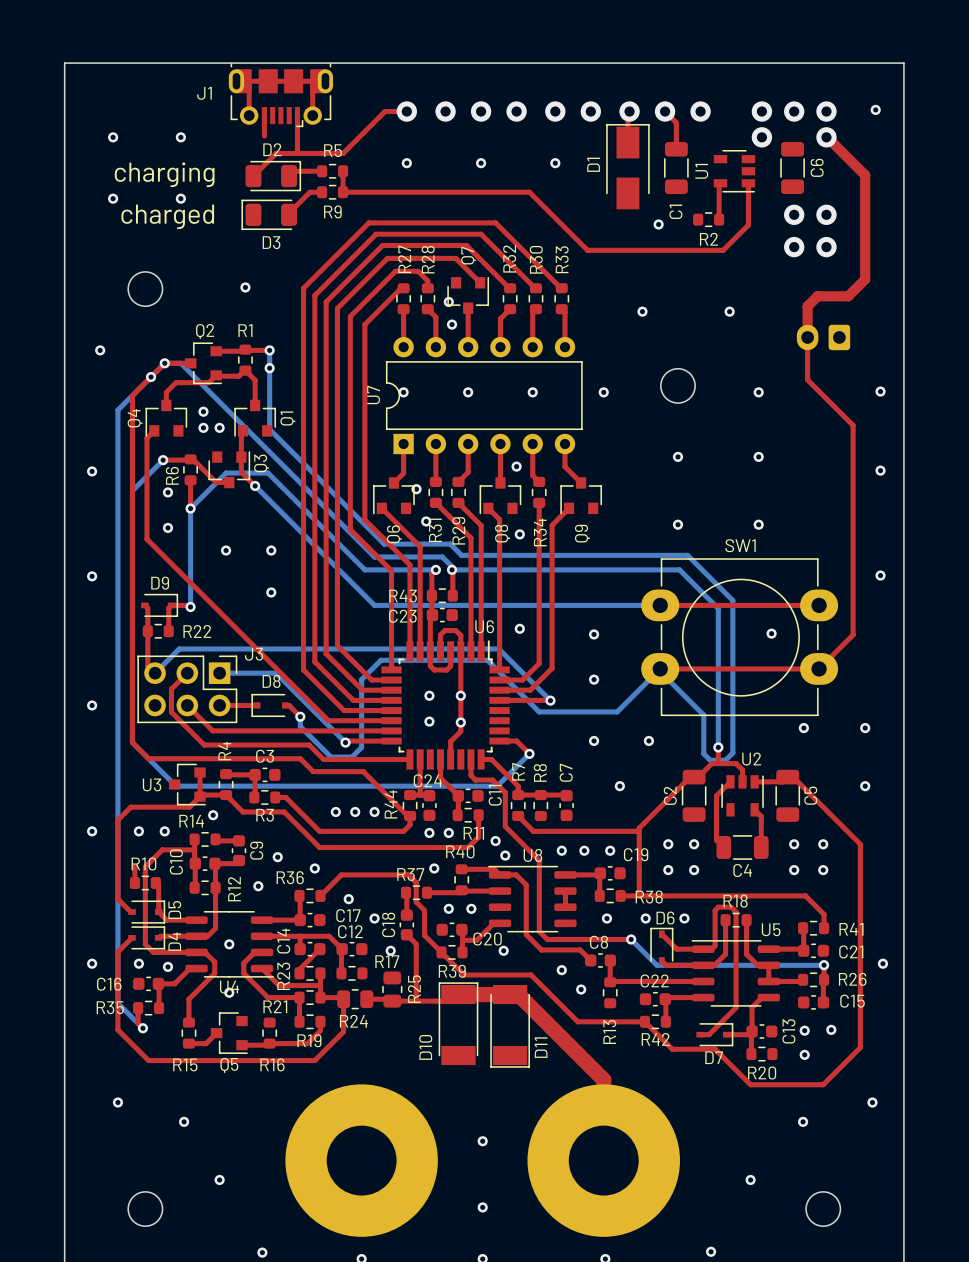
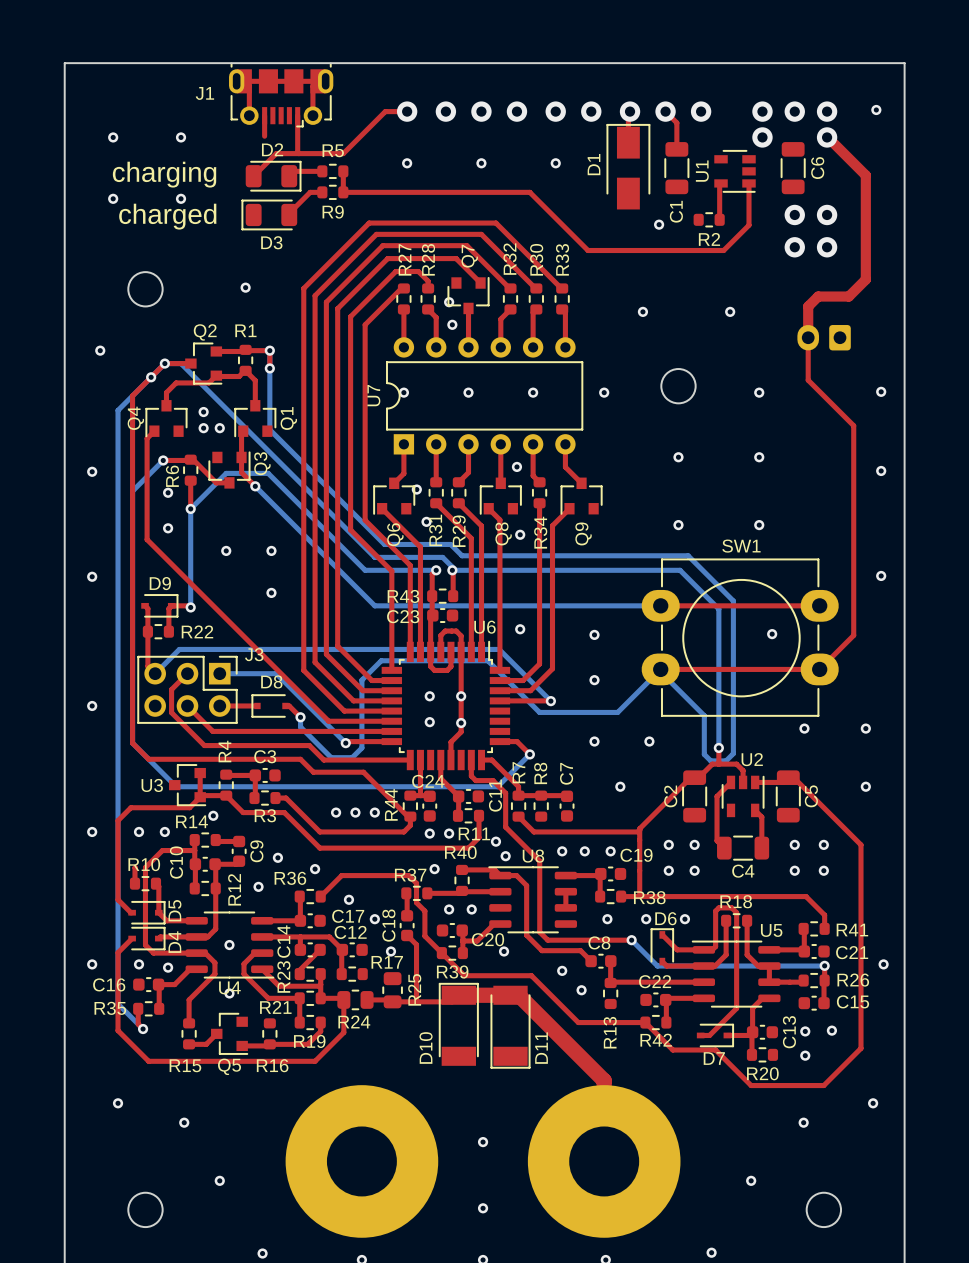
top track: none -> (269, 350) (269, 368)

